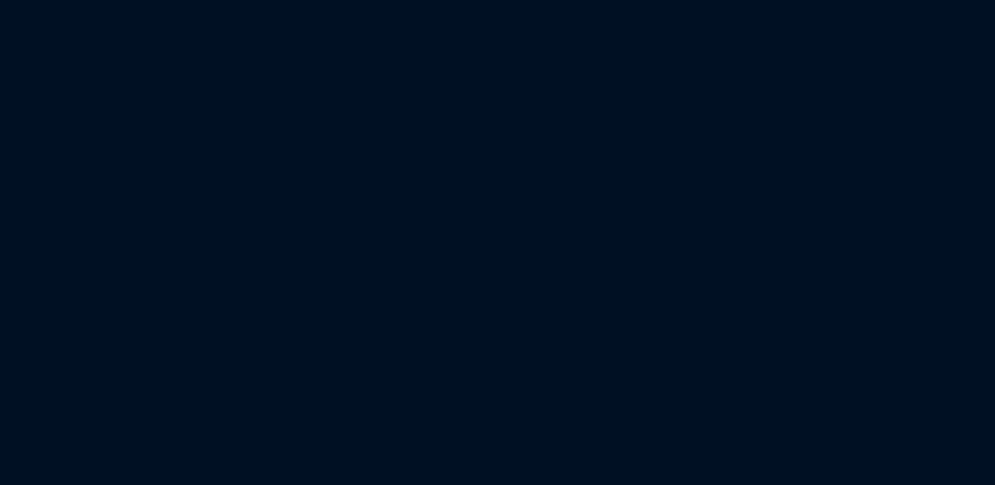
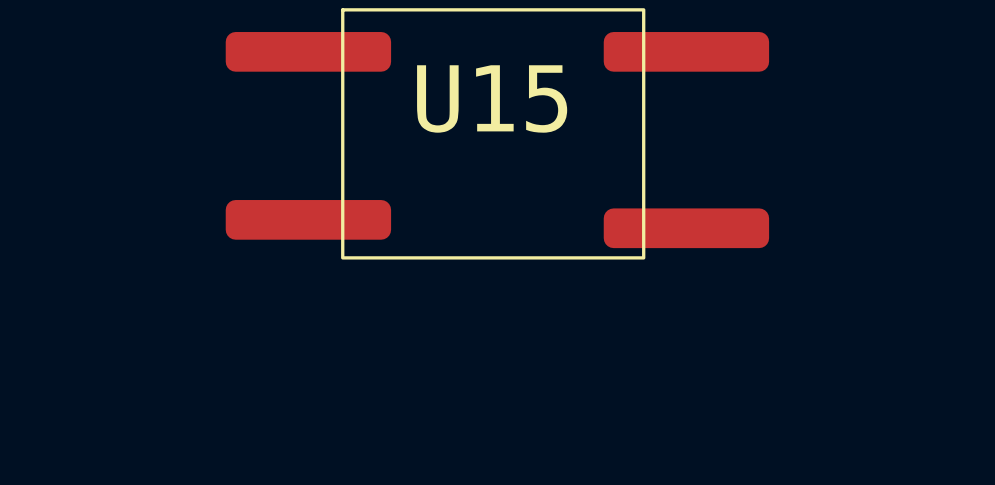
U15: none -> (497, 133)

